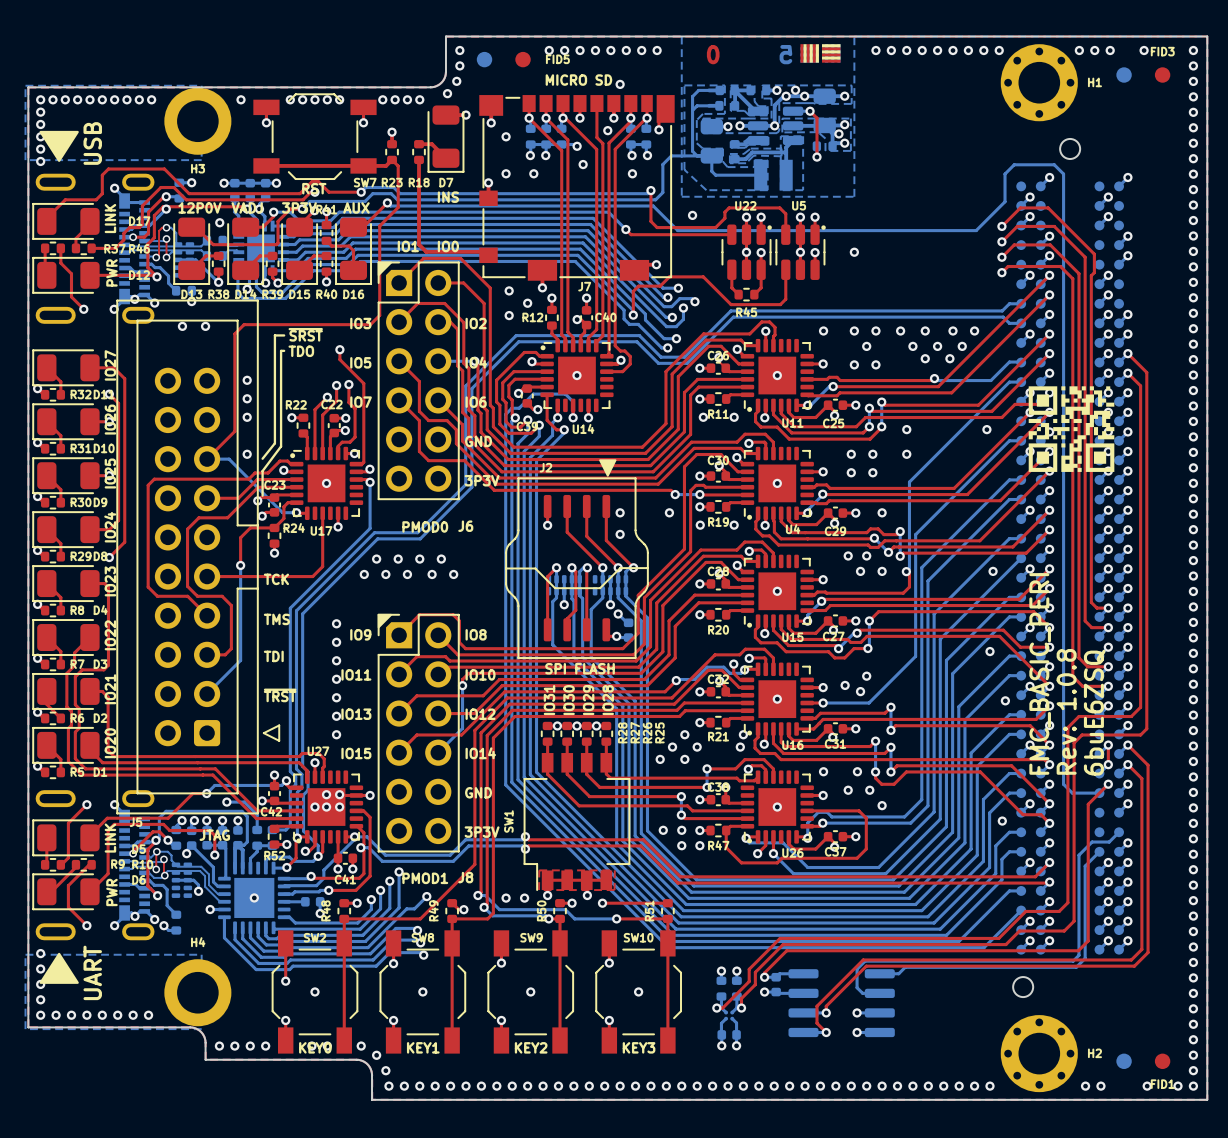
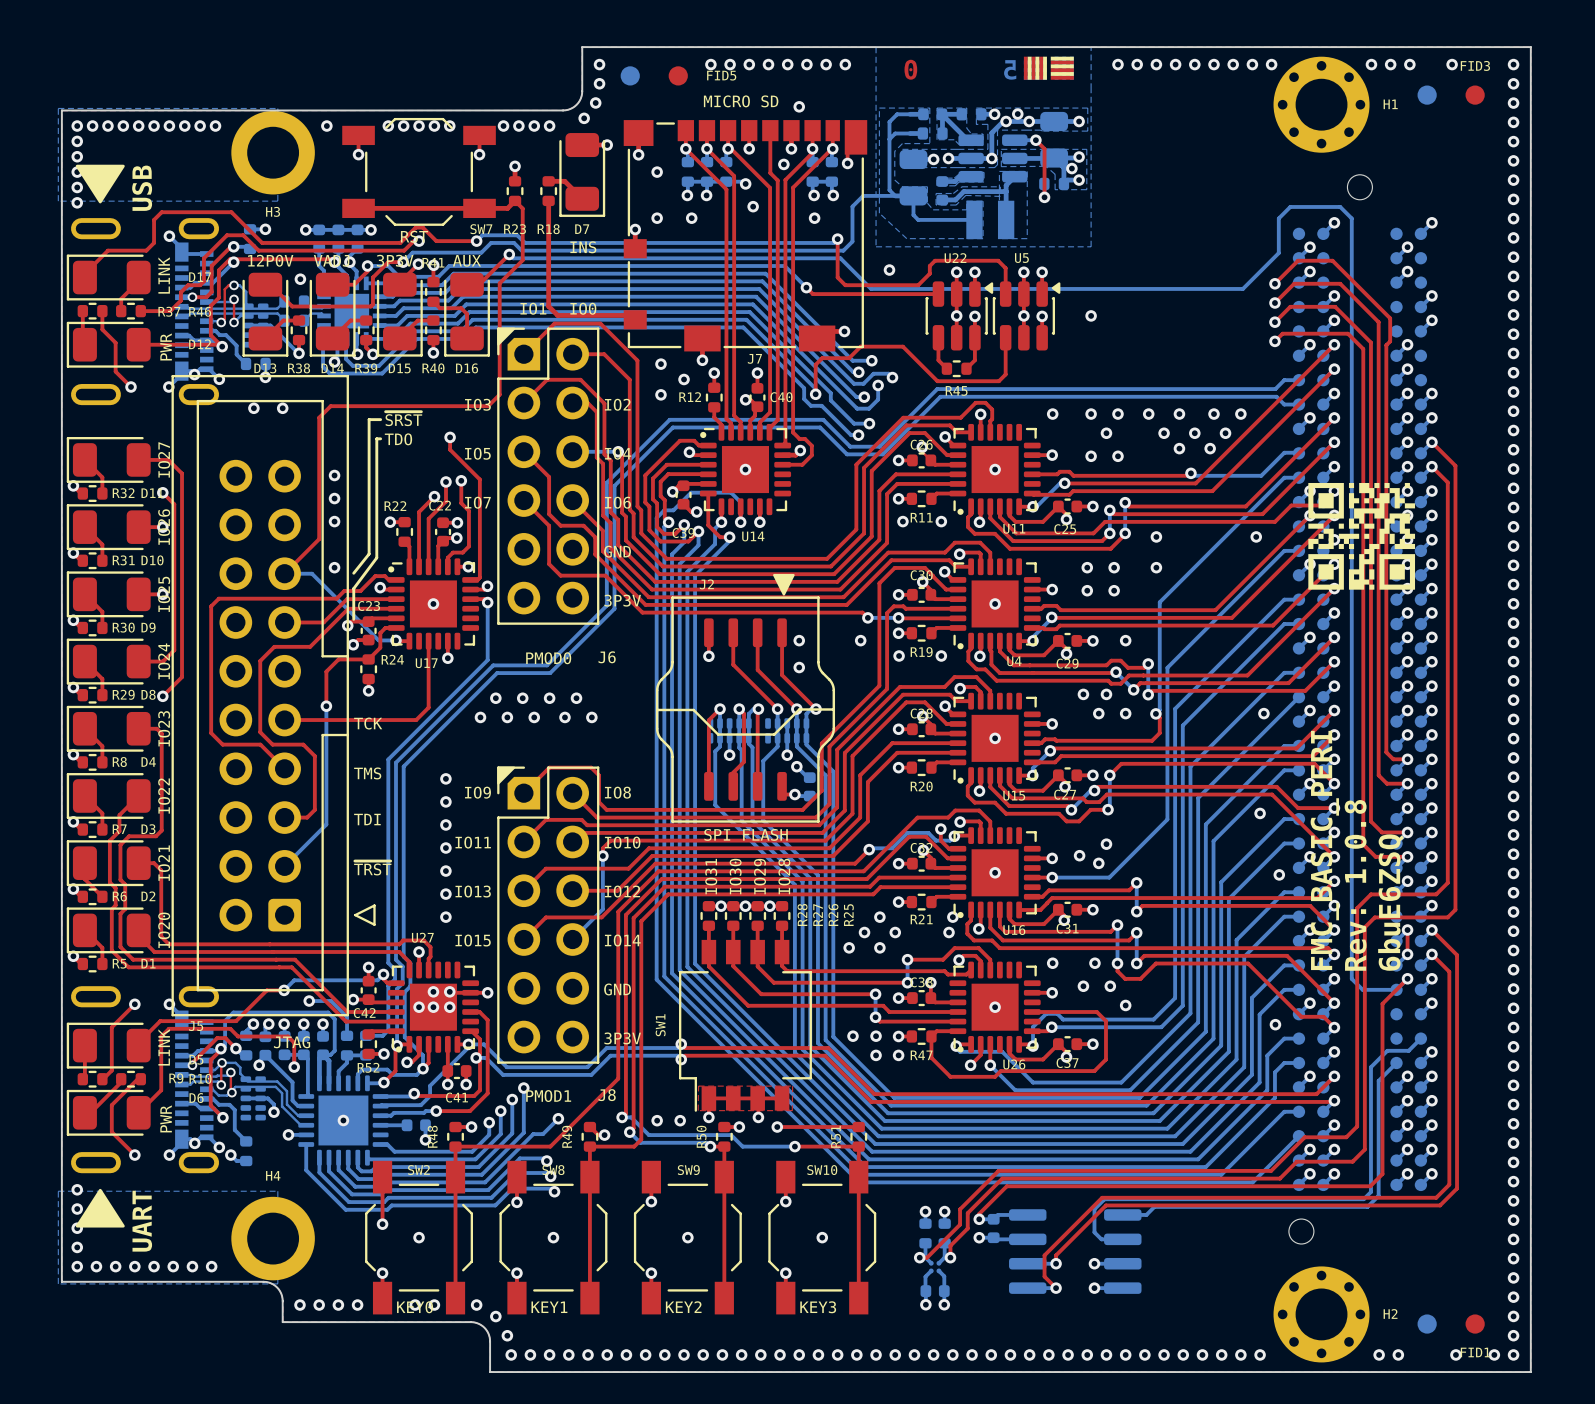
U22 footprint: [721, 224, 772, 280] -> [925, 281, 994, 351]
U5 footprint: [775, 224, 826, 280] -> [992, 281, 1061, 351]

